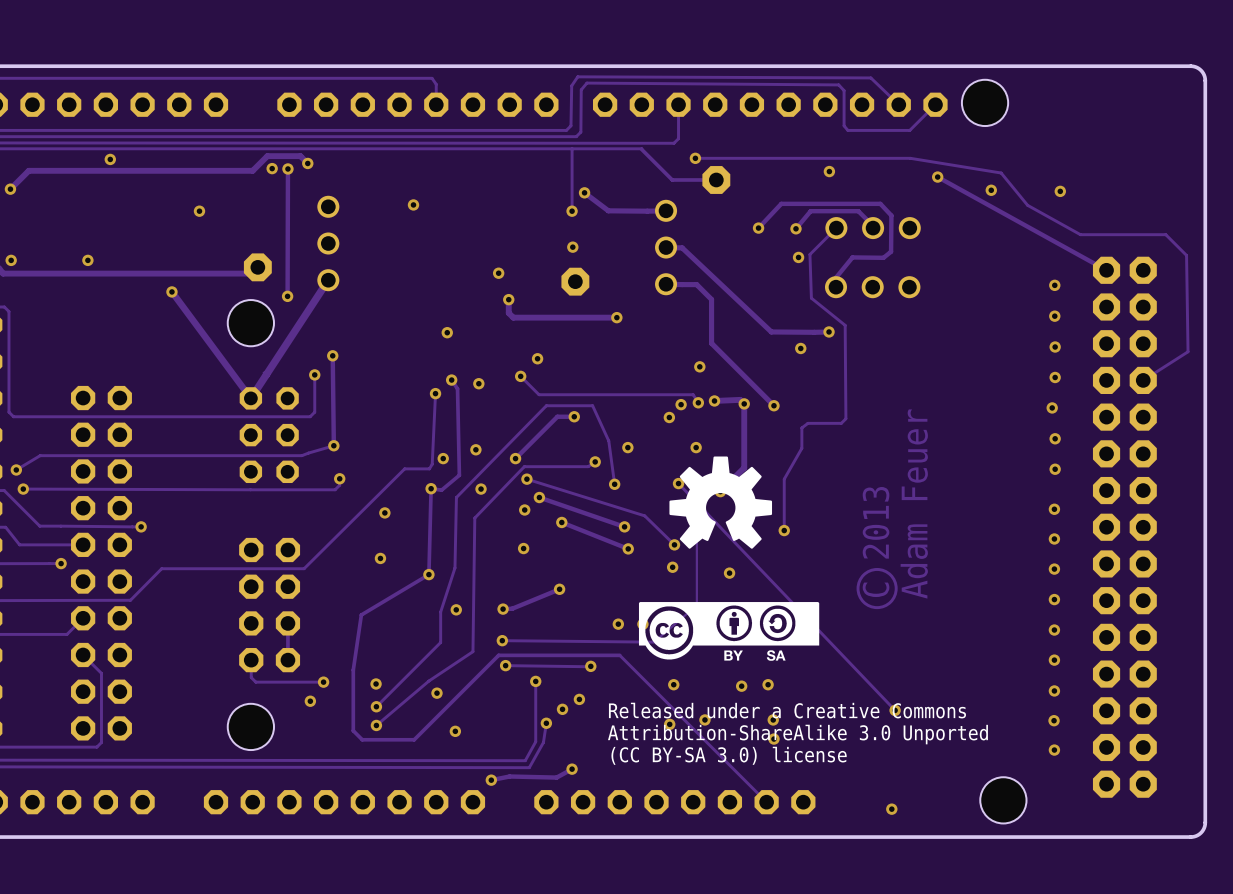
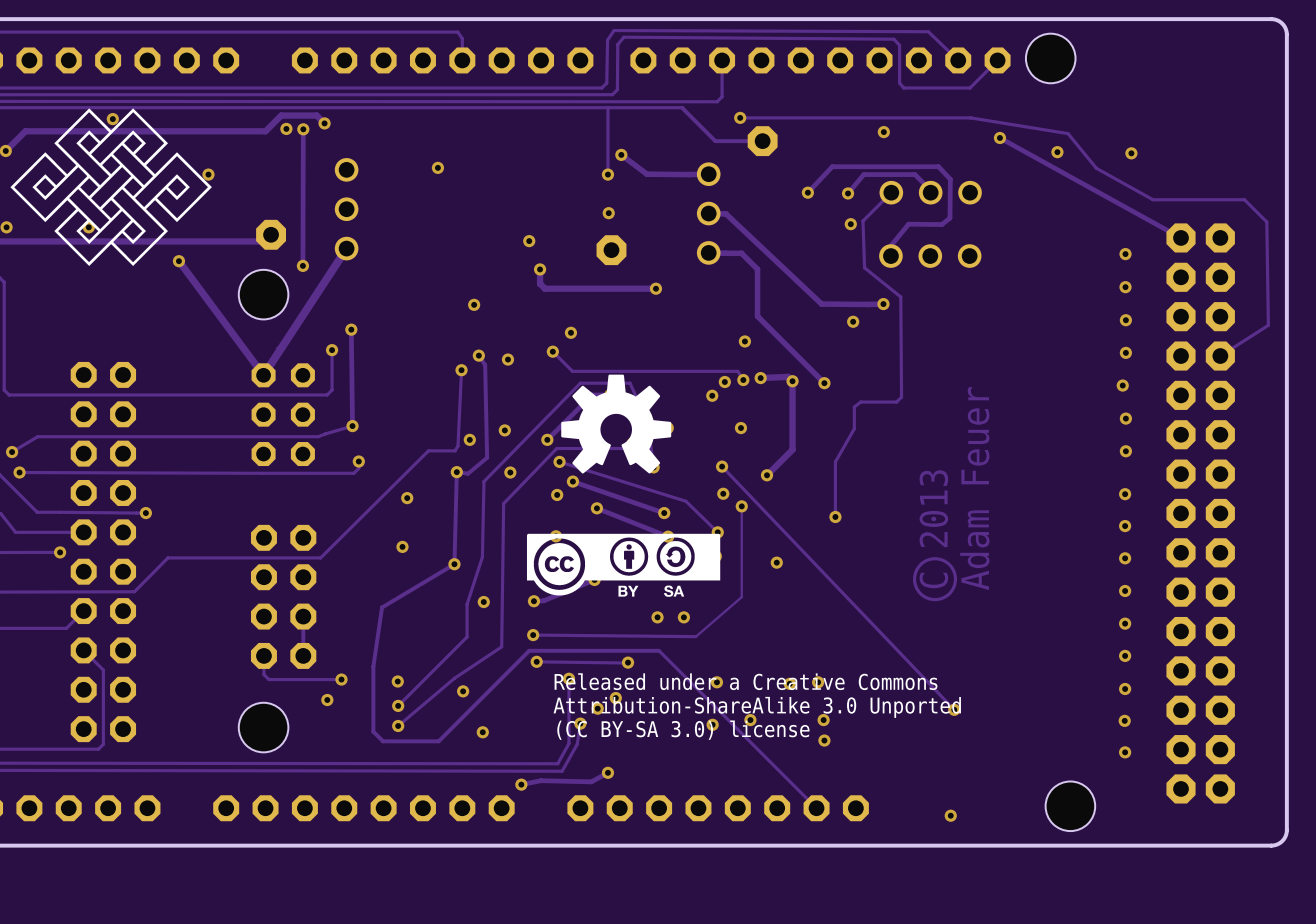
drawing: none -> [10, 108, 212, 266]
drawing position: (720, 502) -> (616, 424)
drawing position: (729, 631) -> (623, 565)
text position: Released under a Creative Commons (787, 710) -> Released under a Creative Commons (746, 681)
text position: Attribution-ShareAlike 3.0 Unported (797, 734) -> Attribution-ShareAlike 3.0 Unported (757, 707)
text position: (CC BY-SA 3.0) license (729, 755) -> (CC BY-SA 3.0) license (683, 730)

